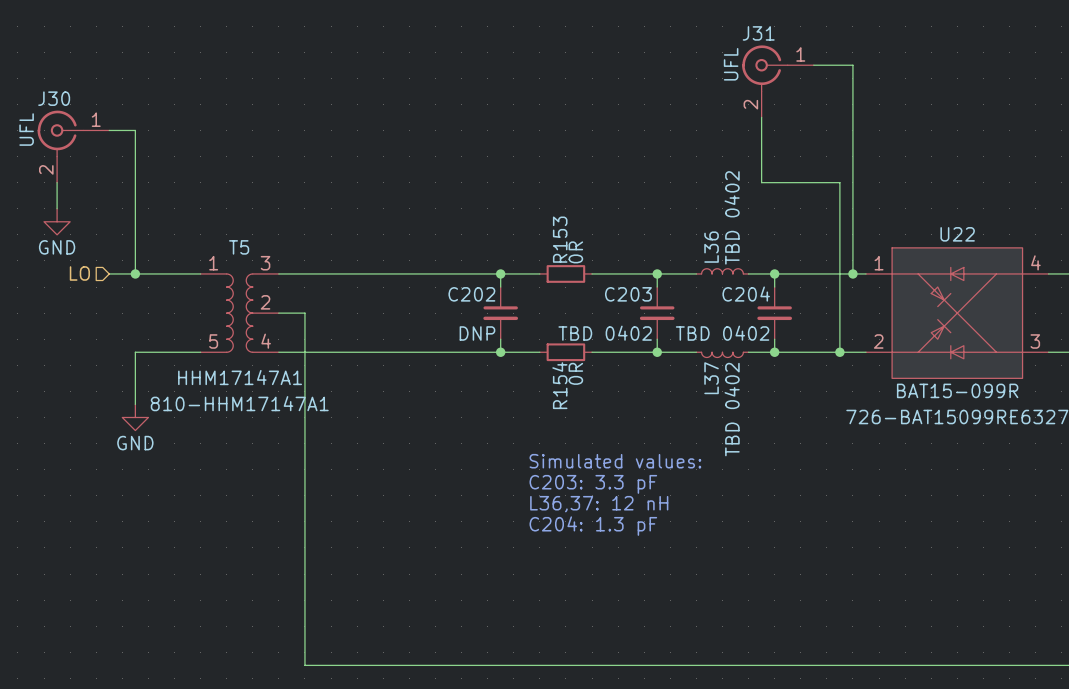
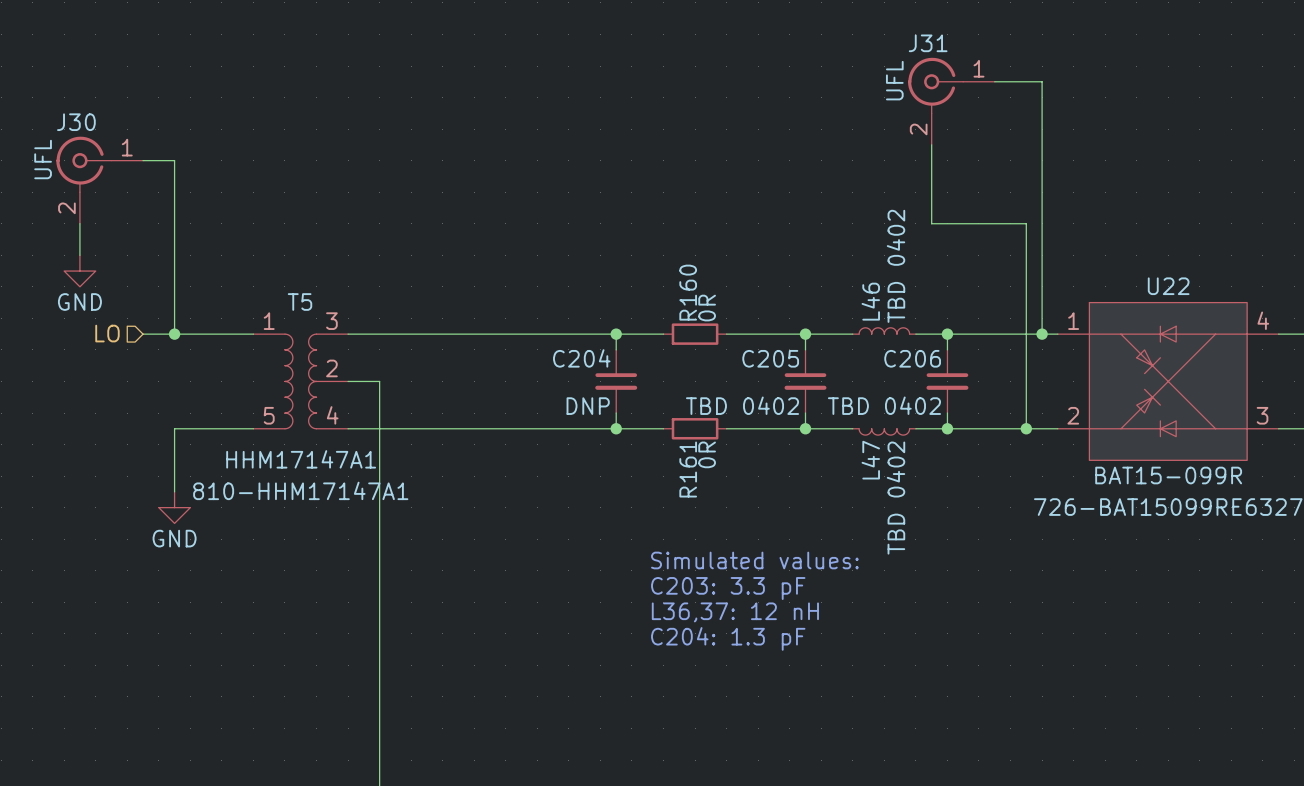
R153 name: R153 (560, 239) -> R160 (688, 292)
L36 name: L36 (711, 247) -> L46 (870, 301)
C202 name: C202 (471, 294) -> C204 (581, 358)
C203 name: C203 (628, 294) -> C205 (770, 358)
C204 name: C204 (746, 294) -> C206 (912, 358)
L37 name: L37 (711, 378) -> L47 (870, 460)
R154 name: R154 (559, 385) -> R161 (688, 469)

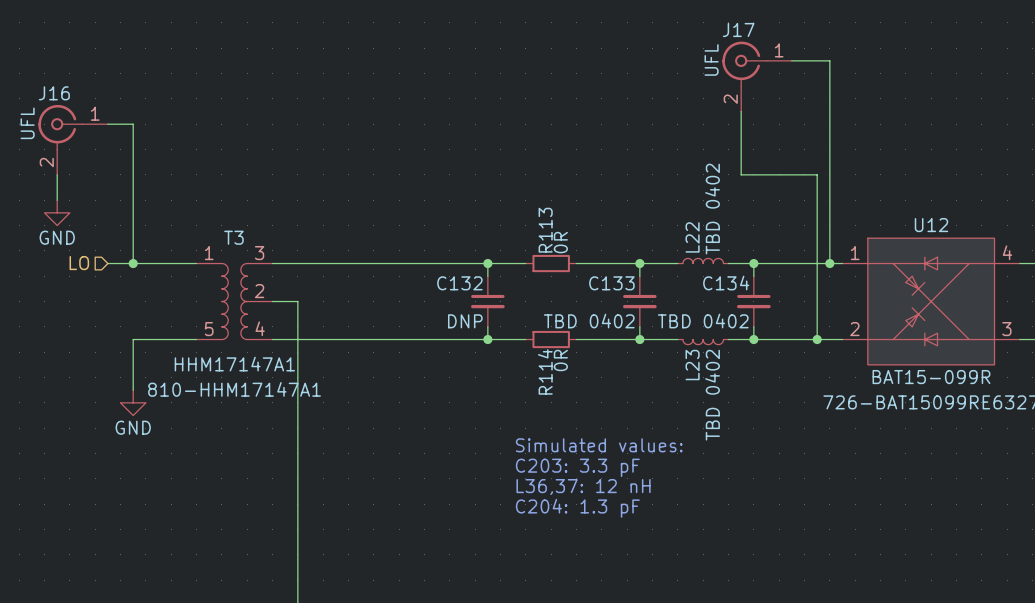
J31 name: J31 (928, 43) -> J17 (738, 30)
J30 name: J30 (76, 122) -> J16 (54, 93)
U22 name: U22 (1168, 286) -> U12 (931, 225)
R160 name: R160 (688, 292) -> R113 (545, 230)
L46 name: L46 (870, 301) -> L22 (692, 237)
T5 name: T5 (300, 302) -> T3 (233, 237)
C204 name: C204 (581, 358) -> C132 (459, 283)
C205 name: C205 (770, 358) -> C133 (611, 283)
C206 name: C206 (912, 358) -> C134 (726, 283)
L47 name: L47 (870, 460) -> L23 (692, 365)
R161 name: R161 (688, 469) -> R114 (545, 371)

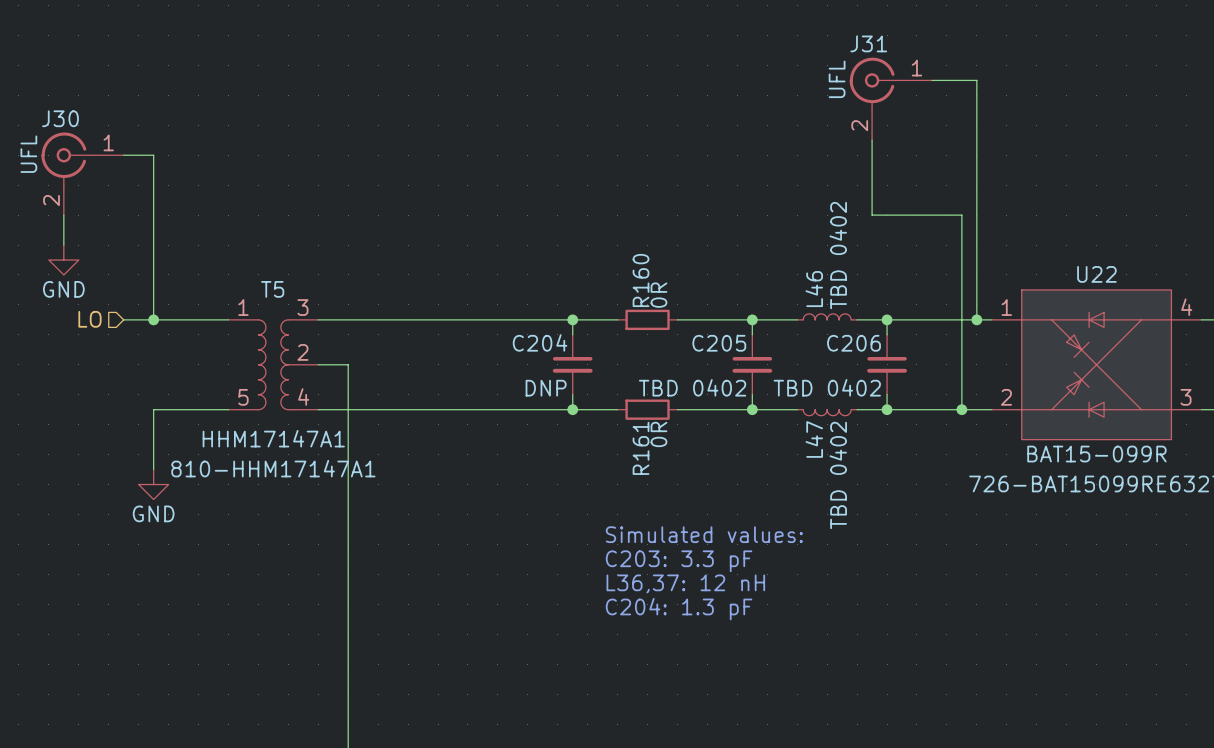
J17 name: J17 (738, 30) -> J31 (868, 43)
J16 name: J16 (54, 93) -> J30 (60, 118)
U12 name: U12 (931, 225) -> U22 (1096, 274)
R113 name: R113 (545, 230) -> R160 (641, 280)
T3 name: T3 (233, 237) -> T5 (272, 289)
L22 name: L22 (692, 237) -> L46 (814, 289)
C132 name: C132 (459, 283) -> C204 (540, 342)
C133 name: C133 (611, 283) -> C205 (719, 343)
C134 name: C134 (726, 283) -> C206 (854, 343)
L23 name: L23 (692, 365) -> L47 (814, 439)
R114 name: R114 (545, 371) -> R161 (641, 448)

